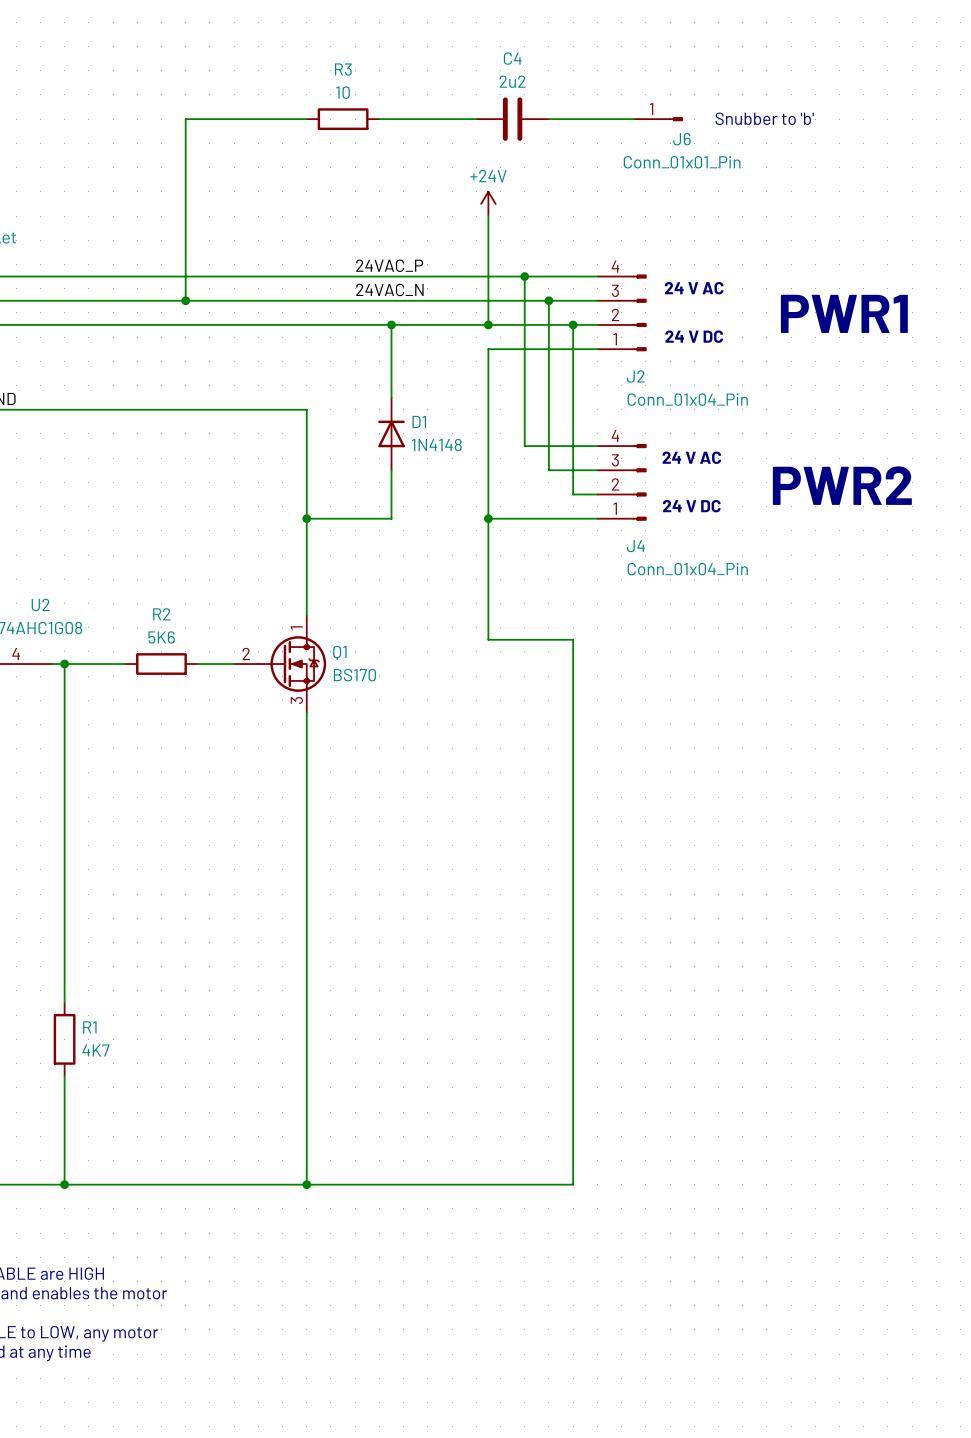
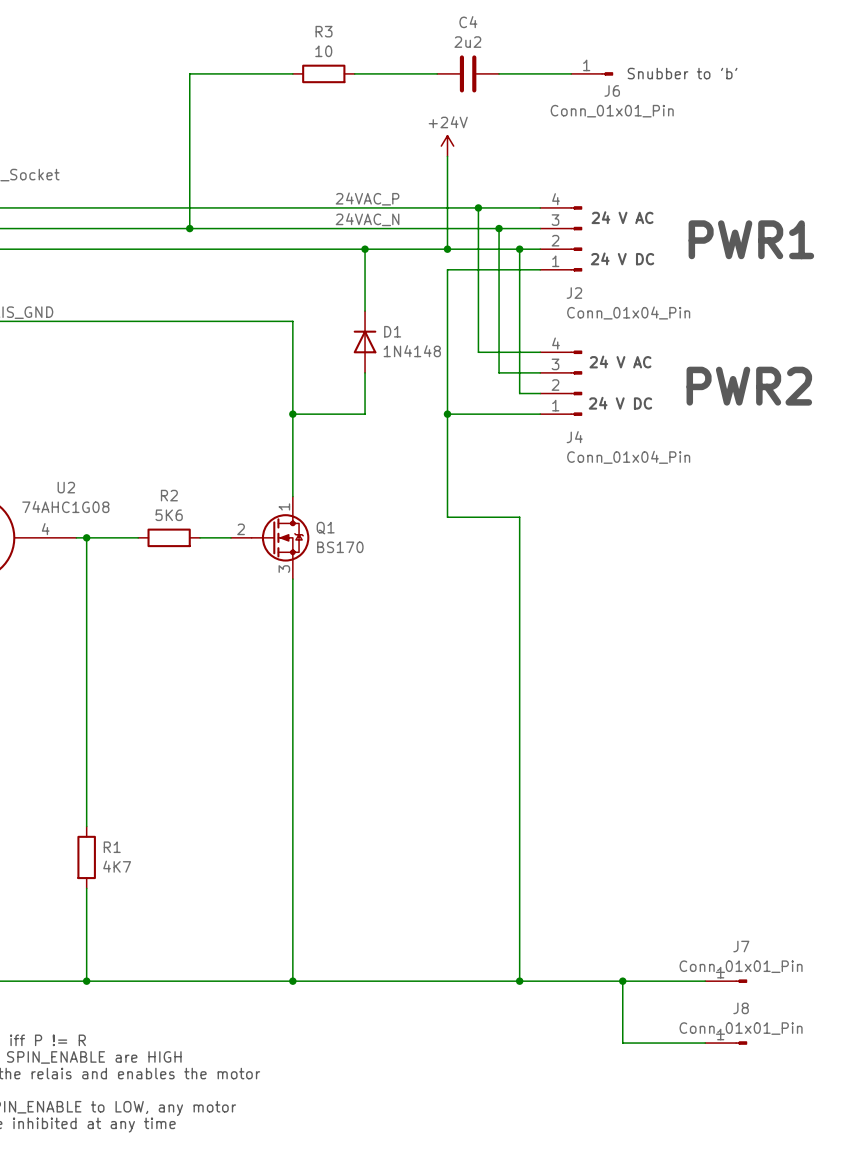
wire: none -> (519, 981) (705, 981)
junction: none -> (519, 981)
wire: none -> (622, 981) (622, 1043) (705, 1043)
junction: none -> (622, 981)
J7: none -> Conn_01x01_Pin (726, 981)
J8: none -> Conn_01x01_Pin (726, 1043)

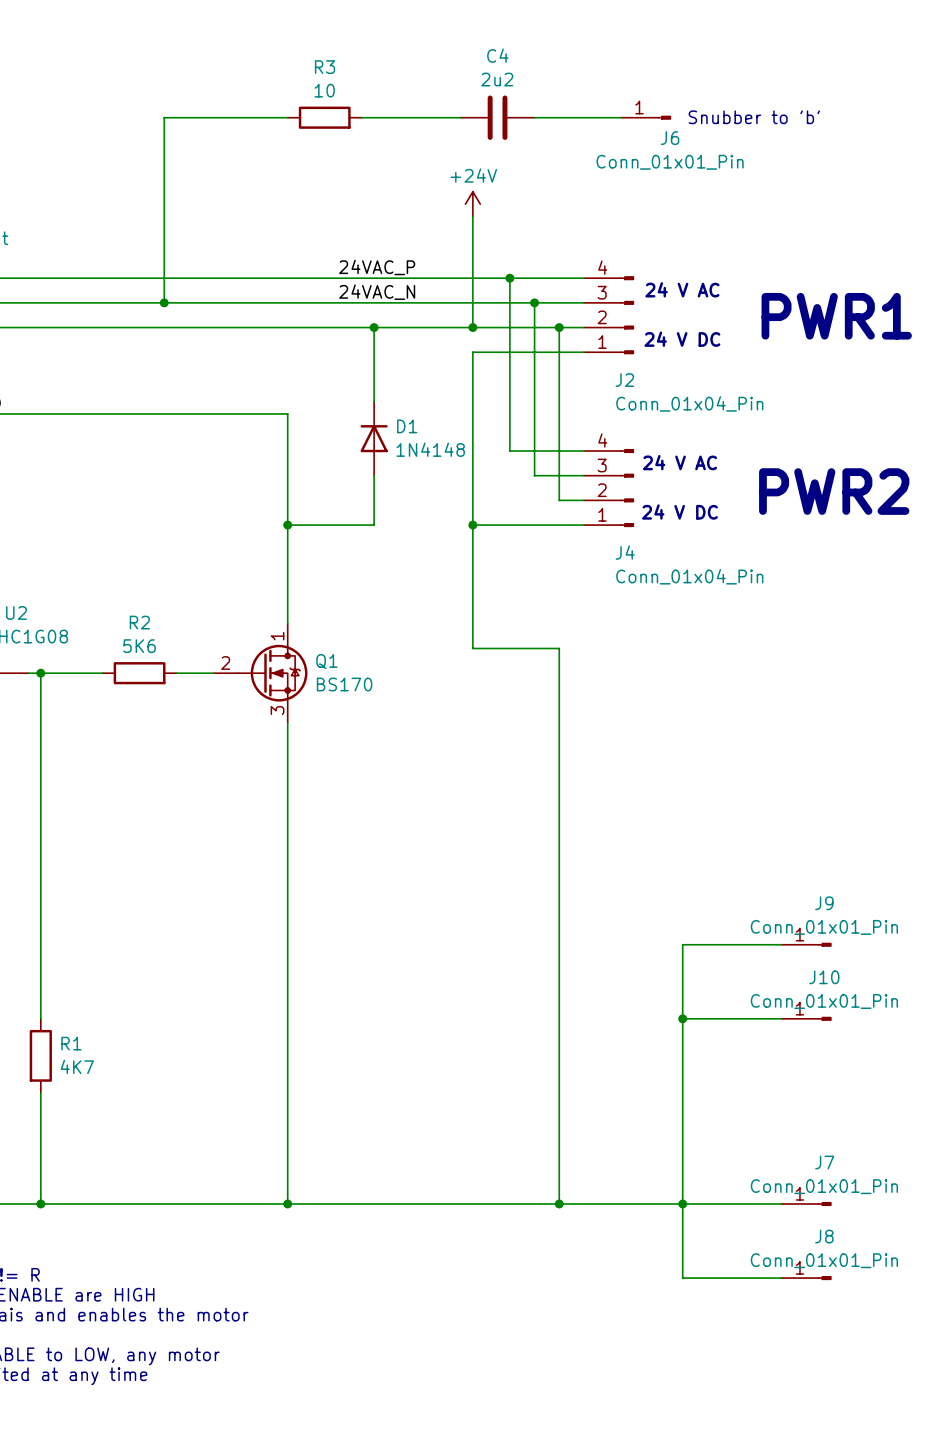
wire: none -> (781, 944) (682, 944) (682, 1203)
J9: none -> Conn_01x01_Pin (806, 944)
wire: none -> (682, 1018) (781, 1018)
junction: none -> (682, 1018)
J10: none -> Conn_01x01_Pin (806, 1018)

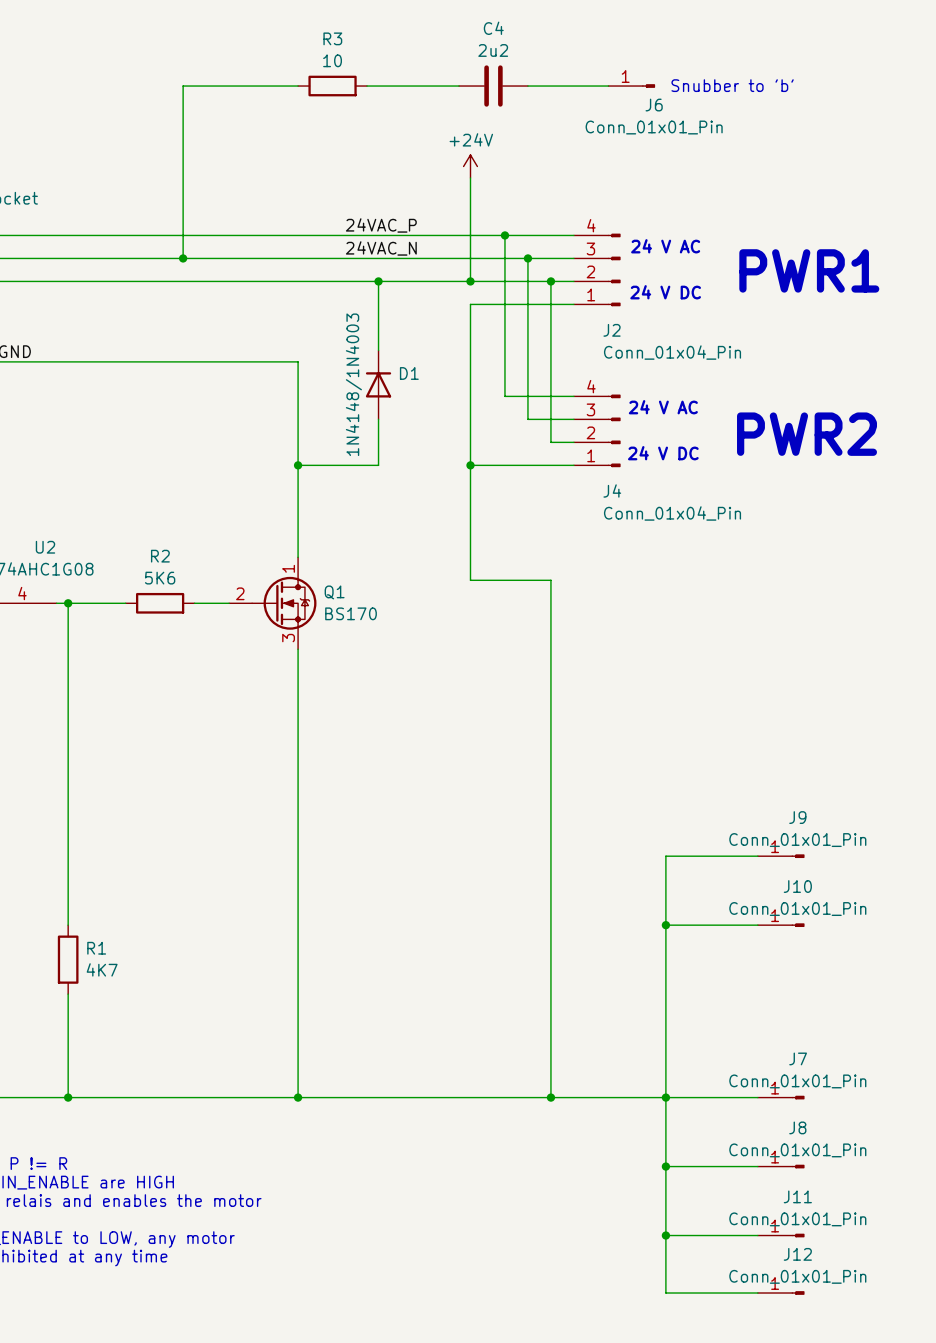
D1 value: 1N4148 (430, 449) -> 1N4148/1N4003 (353, 384)
wire: none -> (665, 1166) (665, 1293) (757, 1293)
junction: none -> (665, 1166)
wire: none -> (665, 1235) (757, 1235)
junction: none -> (665, 1235)
J11: none -> Conn_01x01_Pin (781, 1235)
J12: none -> Conn_01x01_Pin (781, 1293)

